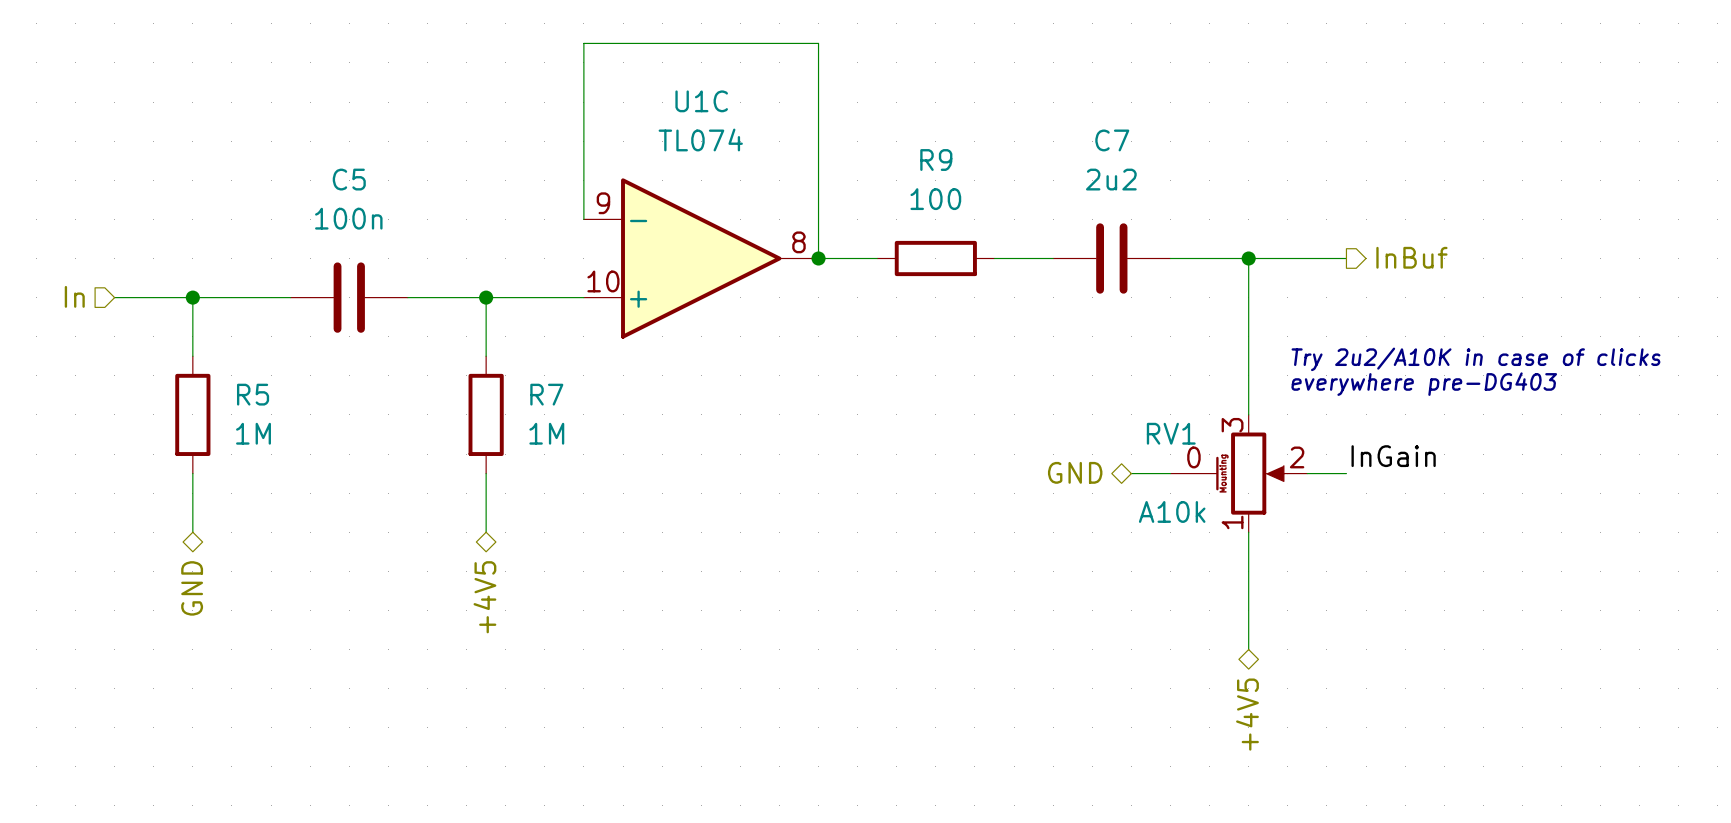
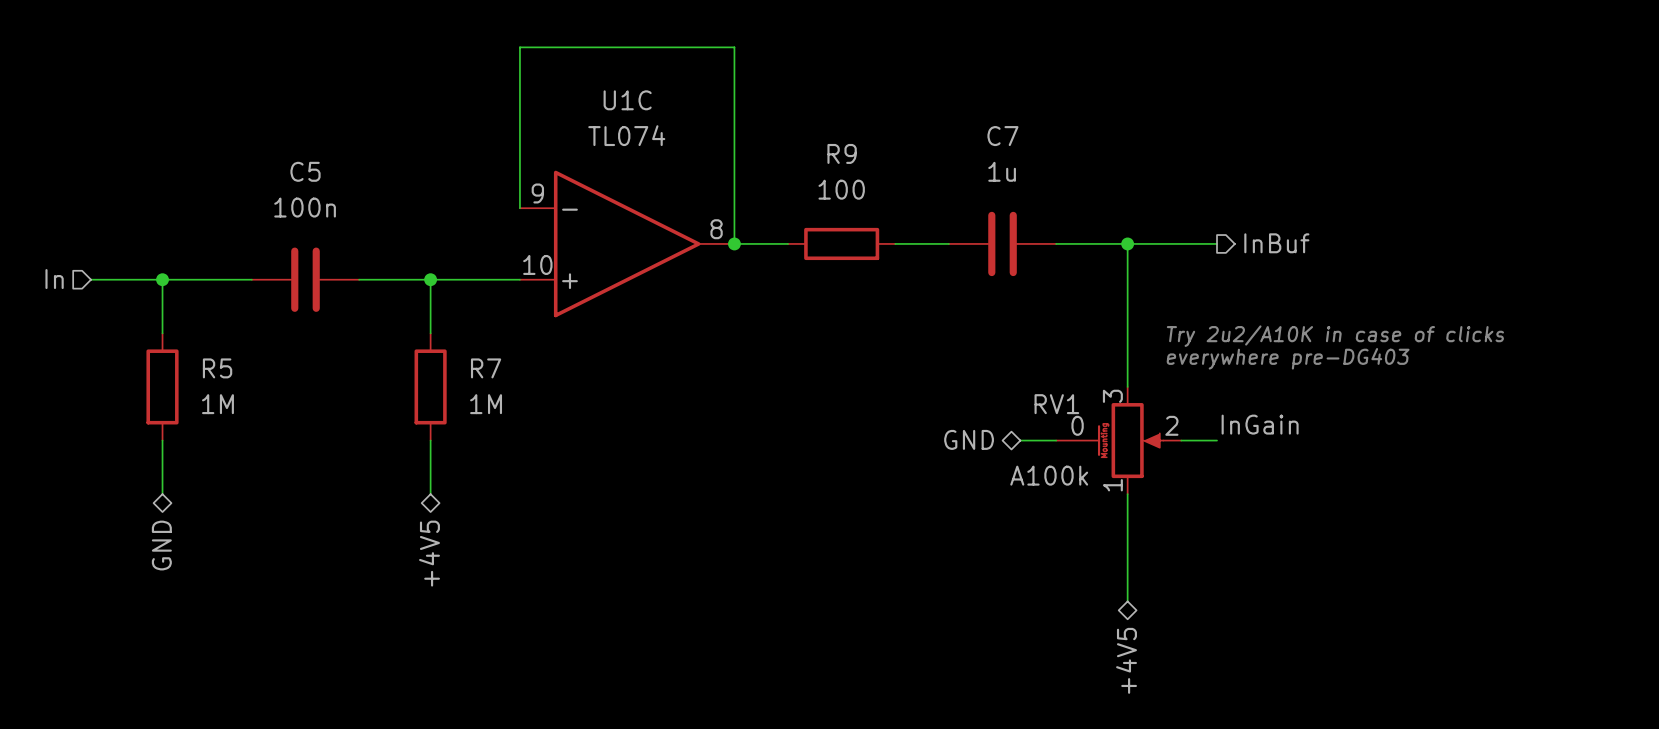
C7 value: 2u2 (1111, 179) -> 1u (1002, 171)
RV1 value: A10k (1172, 511) -> A100k (1049, 475)

